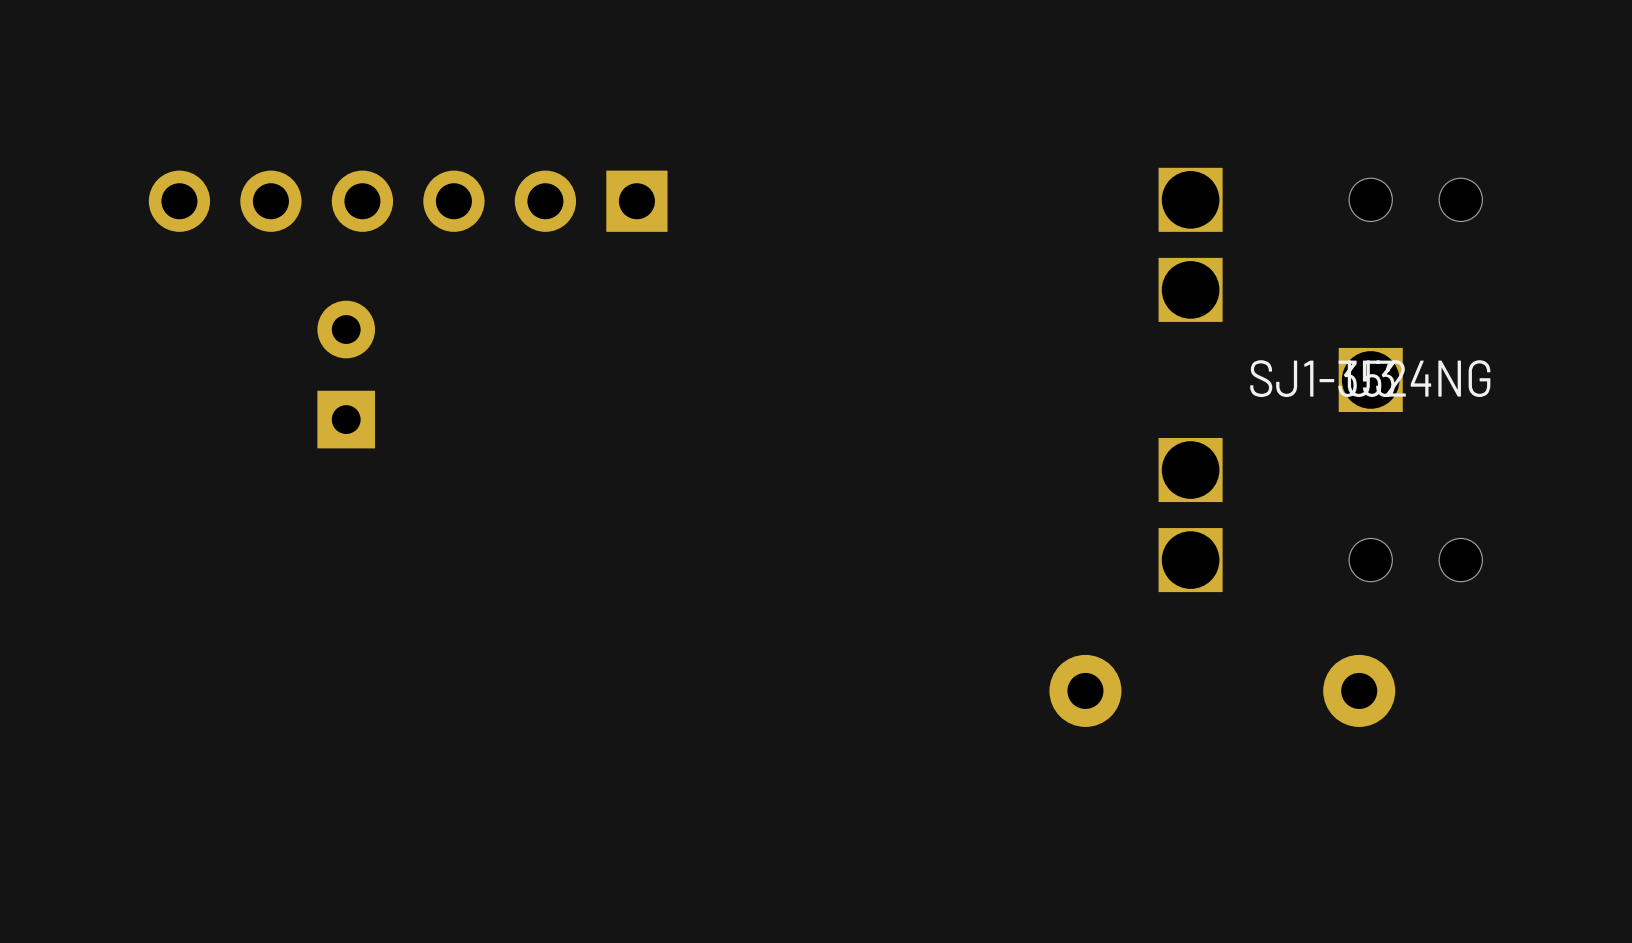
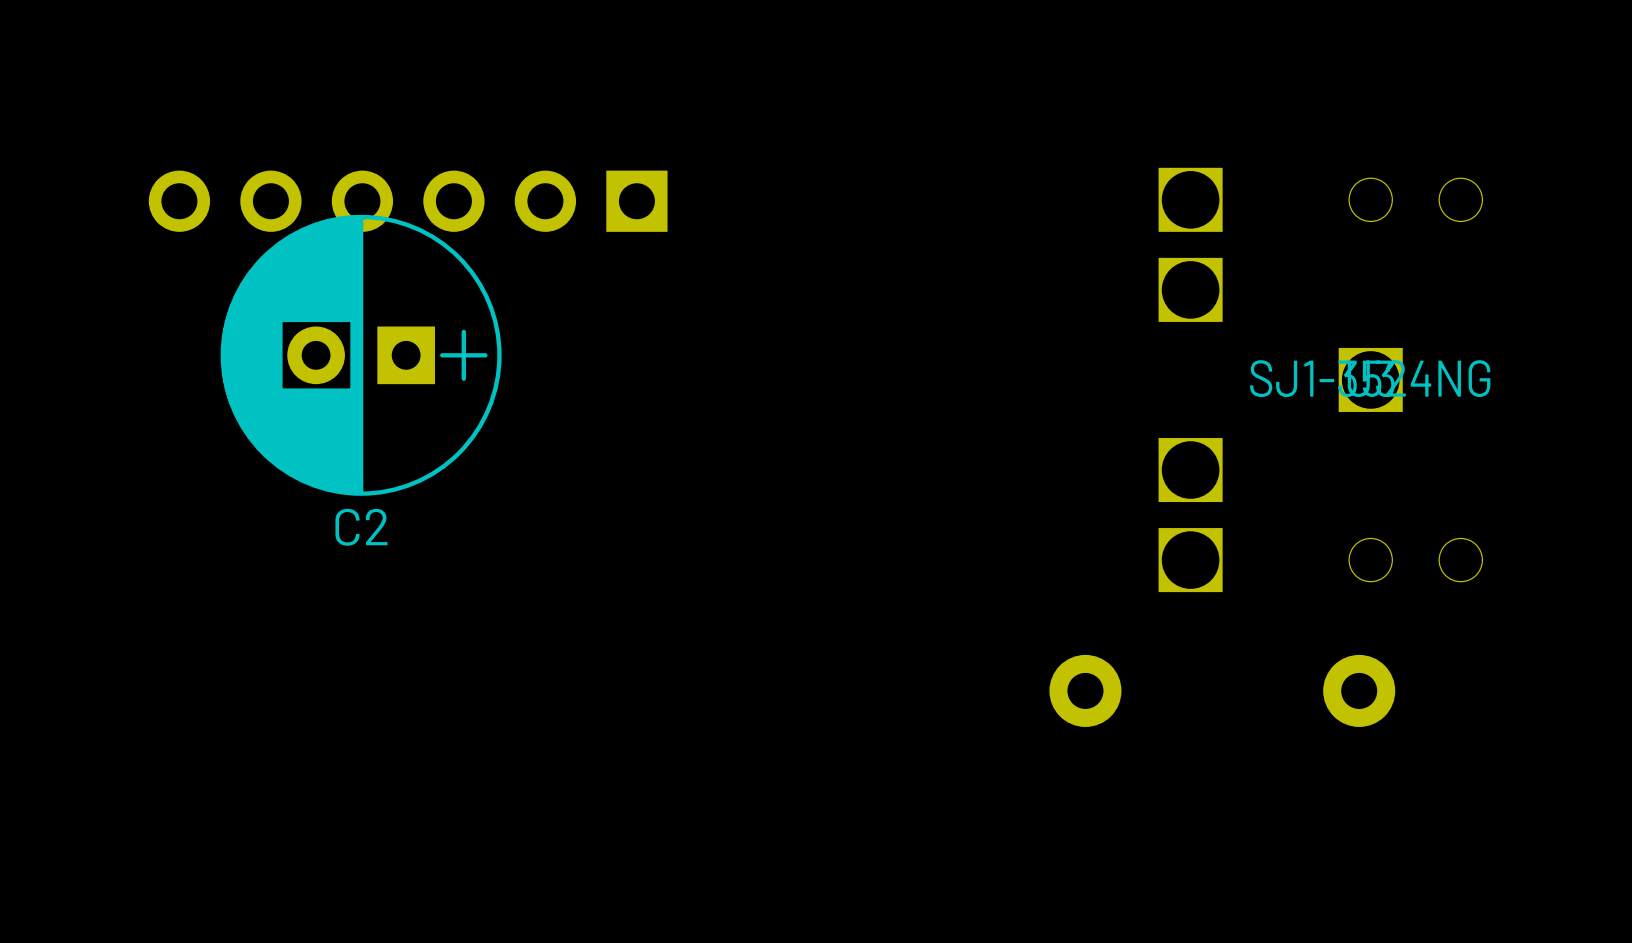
C2 side: top (346, 374) -> bottom (361, 355)

